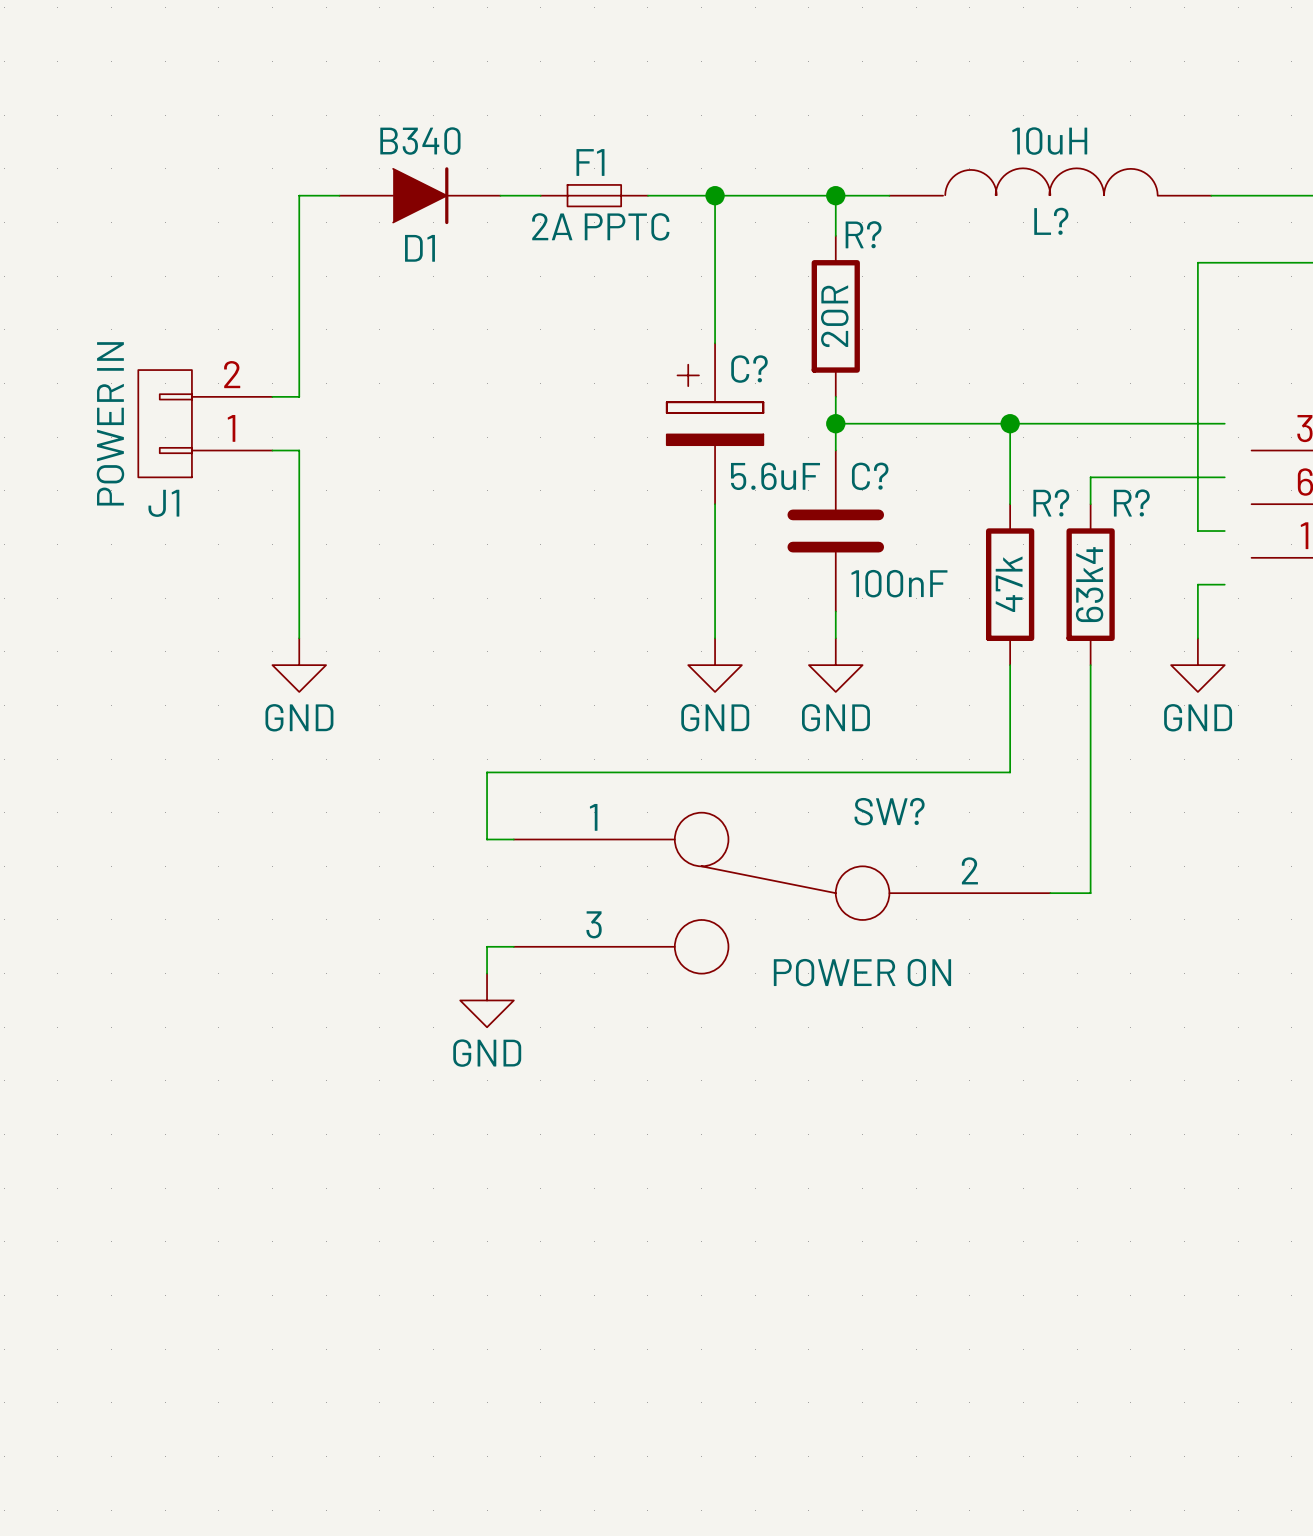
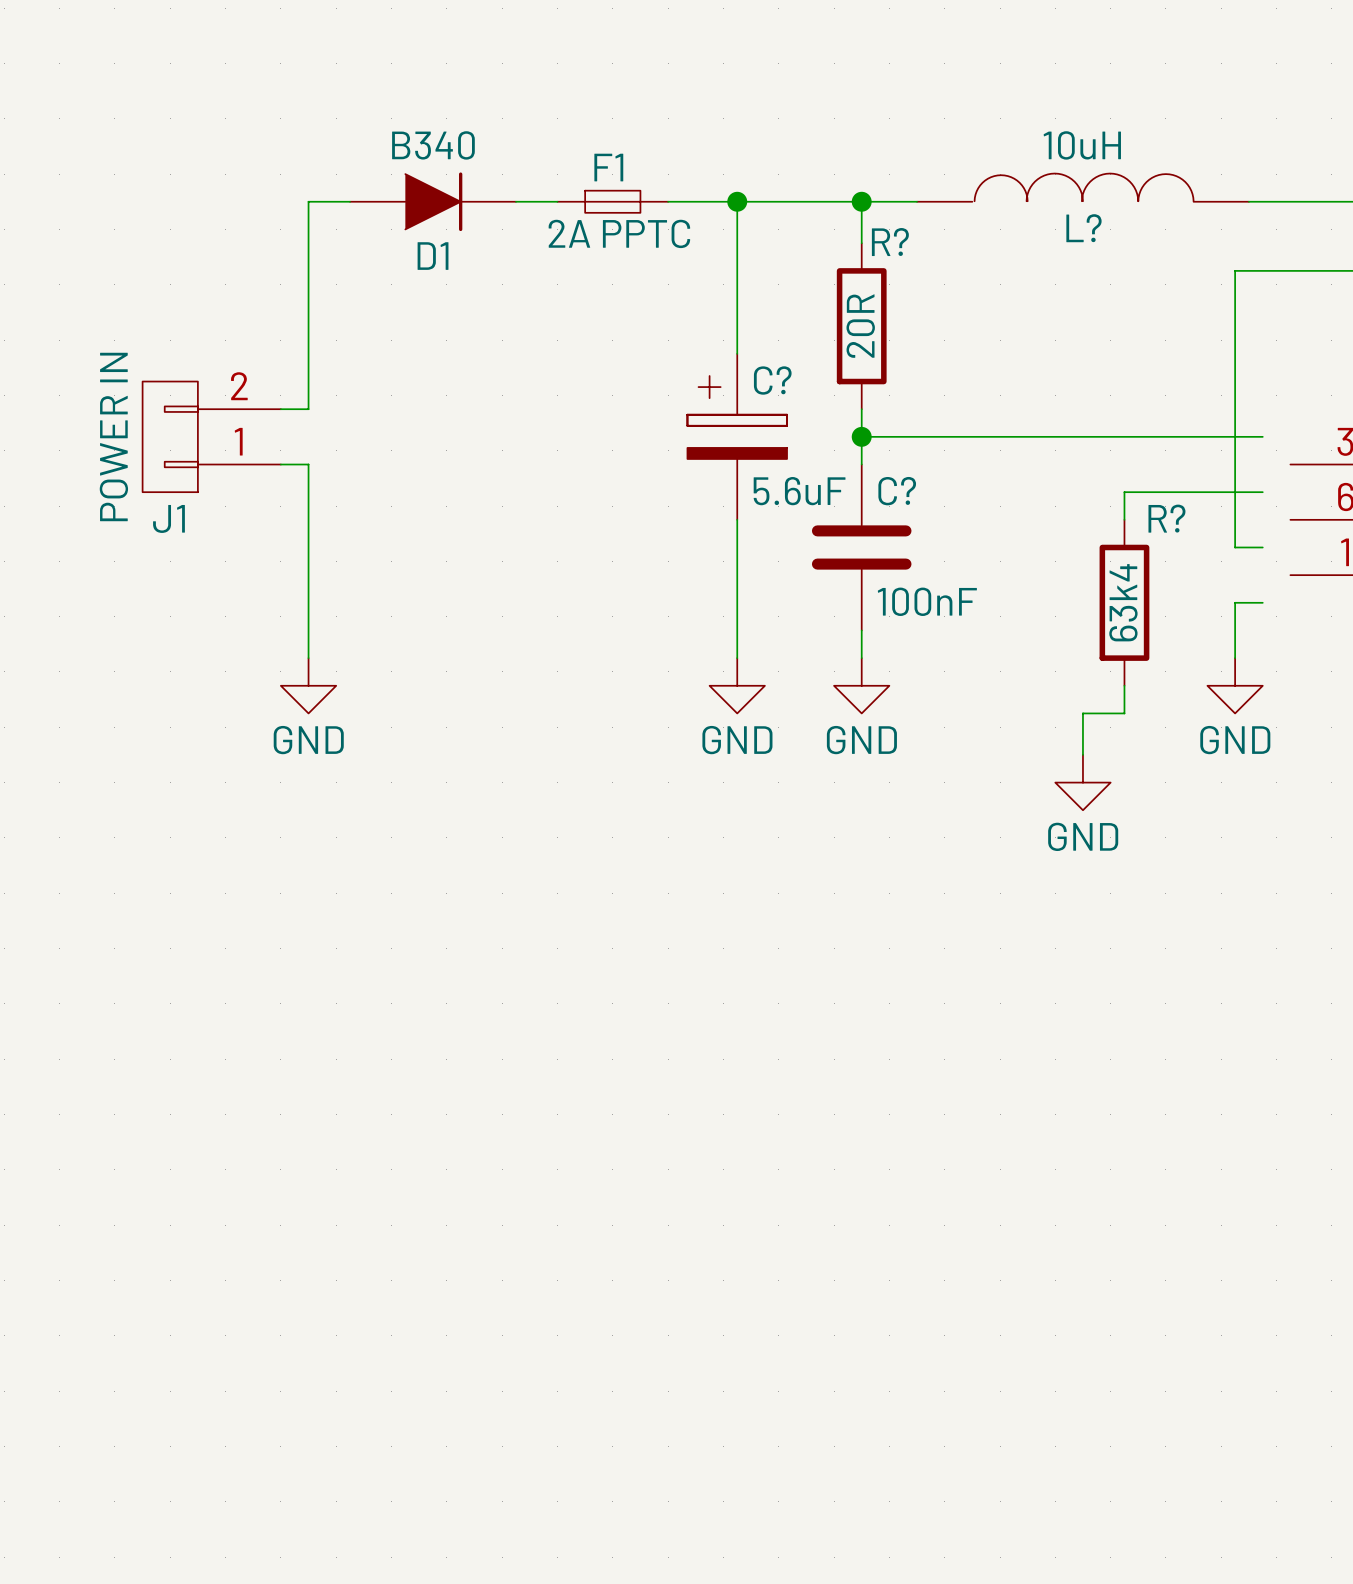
wire: (1010, 423) (1010, 504) -> none
junction: (1010, 423) -> none
R?: 47k (1010, 584) -> none
wire: (1010, 665) (1010, 772) (487, 772) (487, 839) (513, 839) -> none
wire: (1090, 691) (1090, 893) (1050, 893) -> (1124, 713) (1082, 713) (1082, 754)
power symbol: none -> GND (1082, 782)
SW?: POWER ON (782, 893) -> none
wire: (513, 946) (487, 946) (487, 973) -> none
power symbol: GND (487, 1000) -> none

